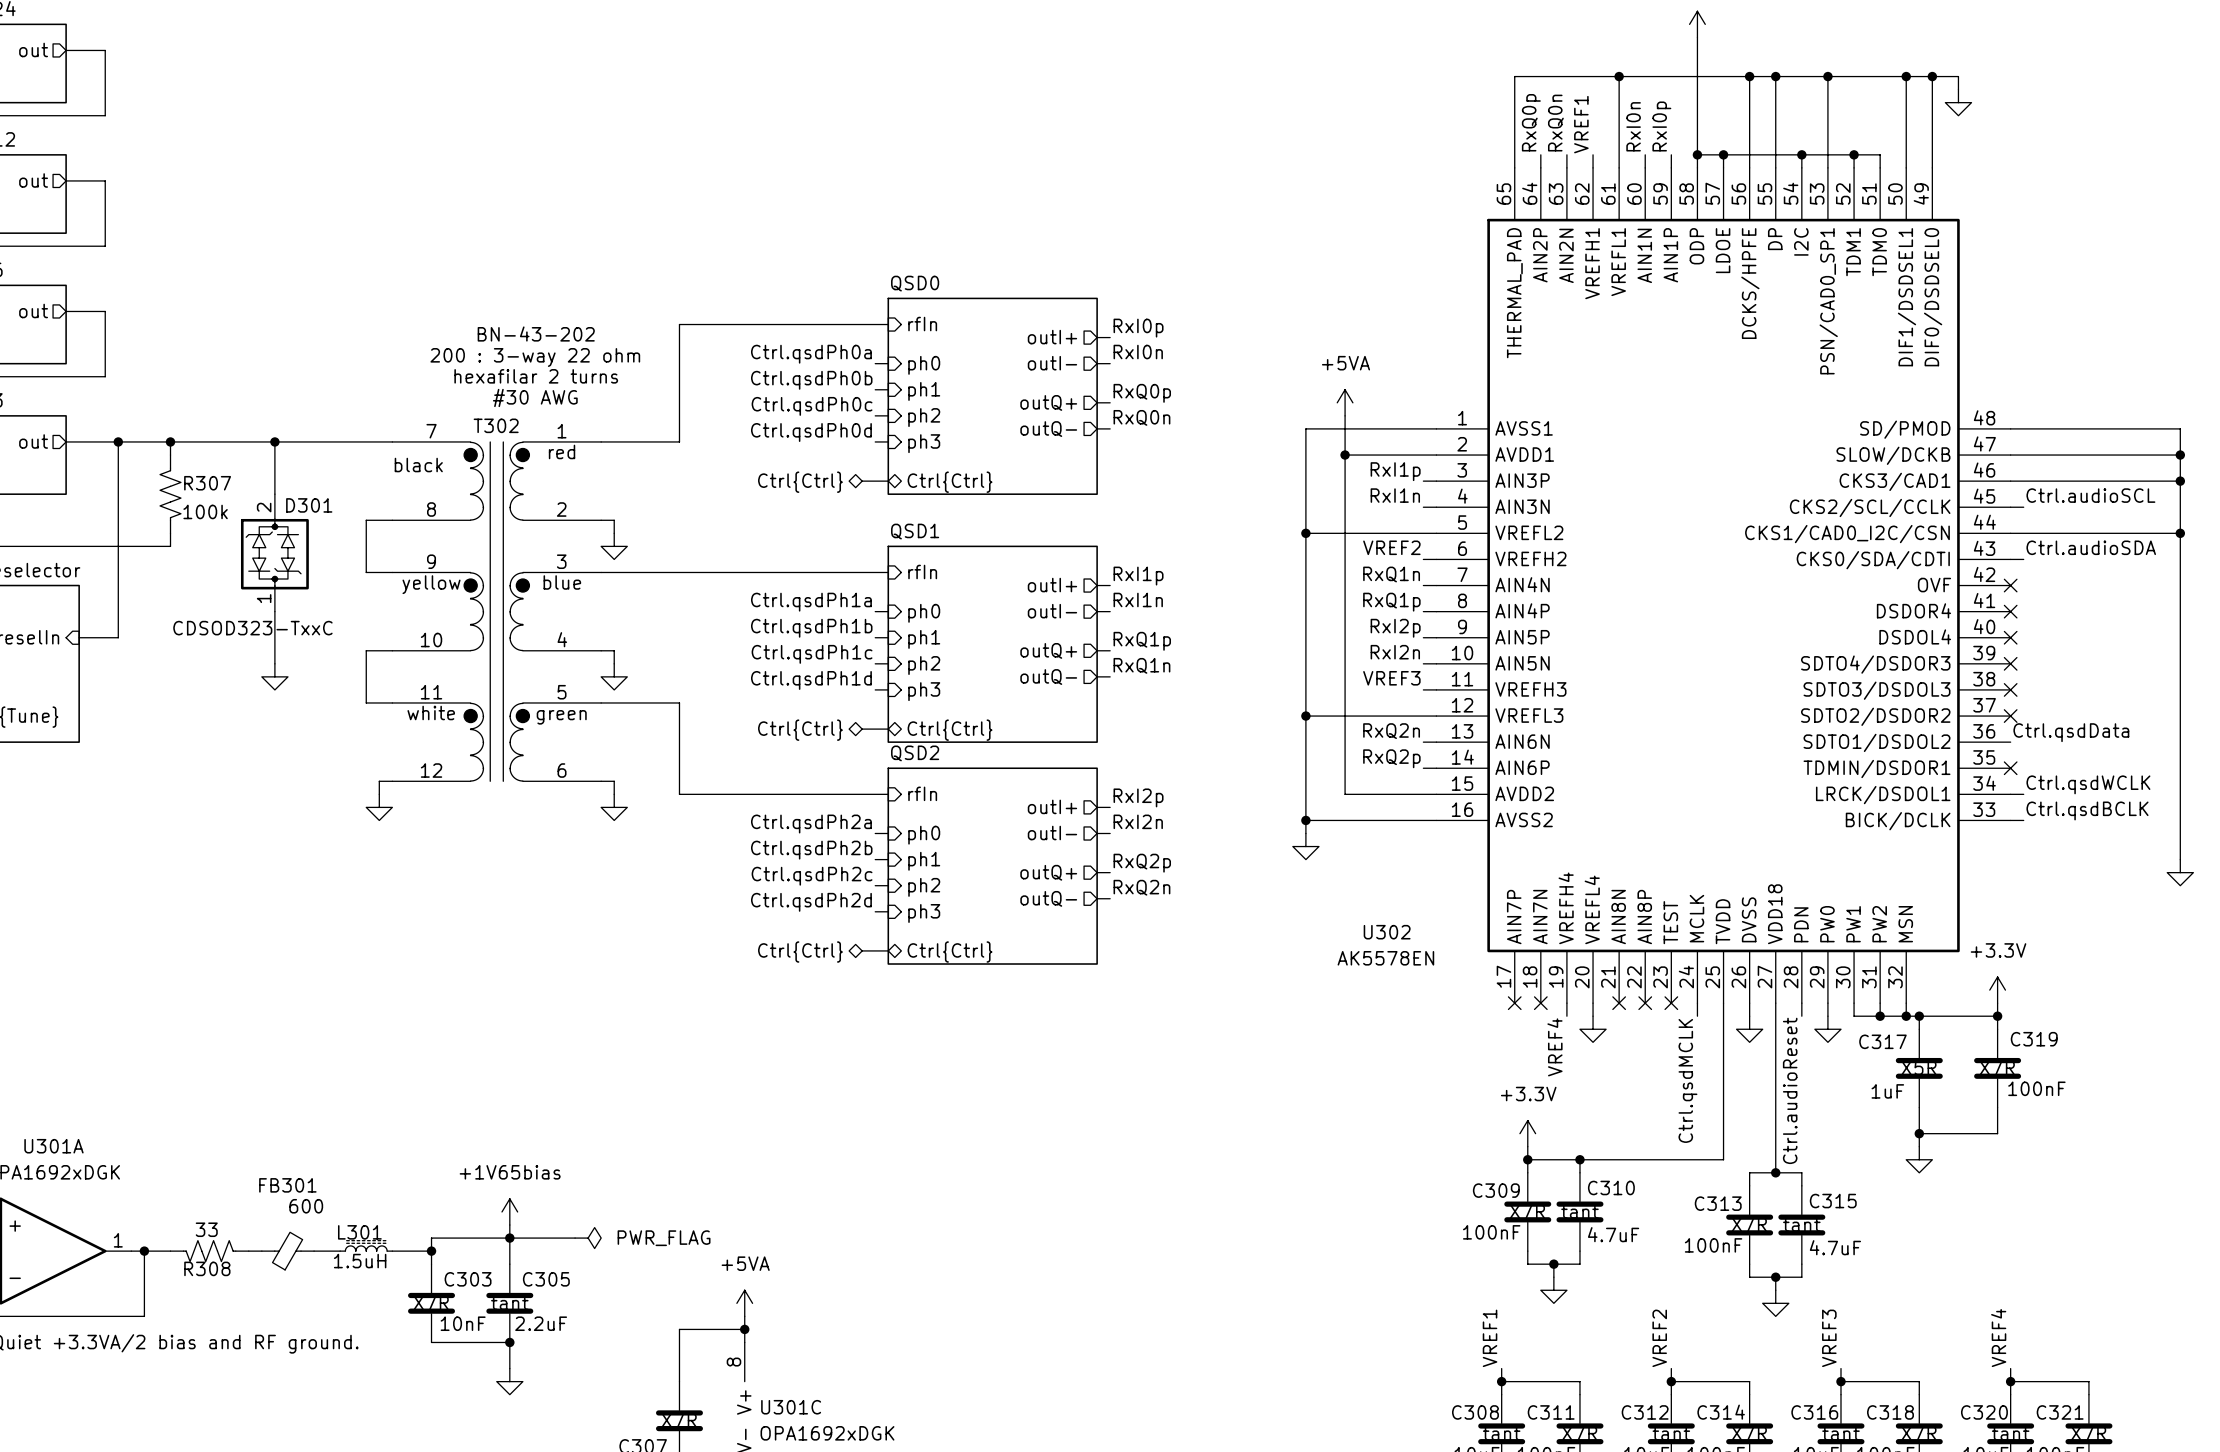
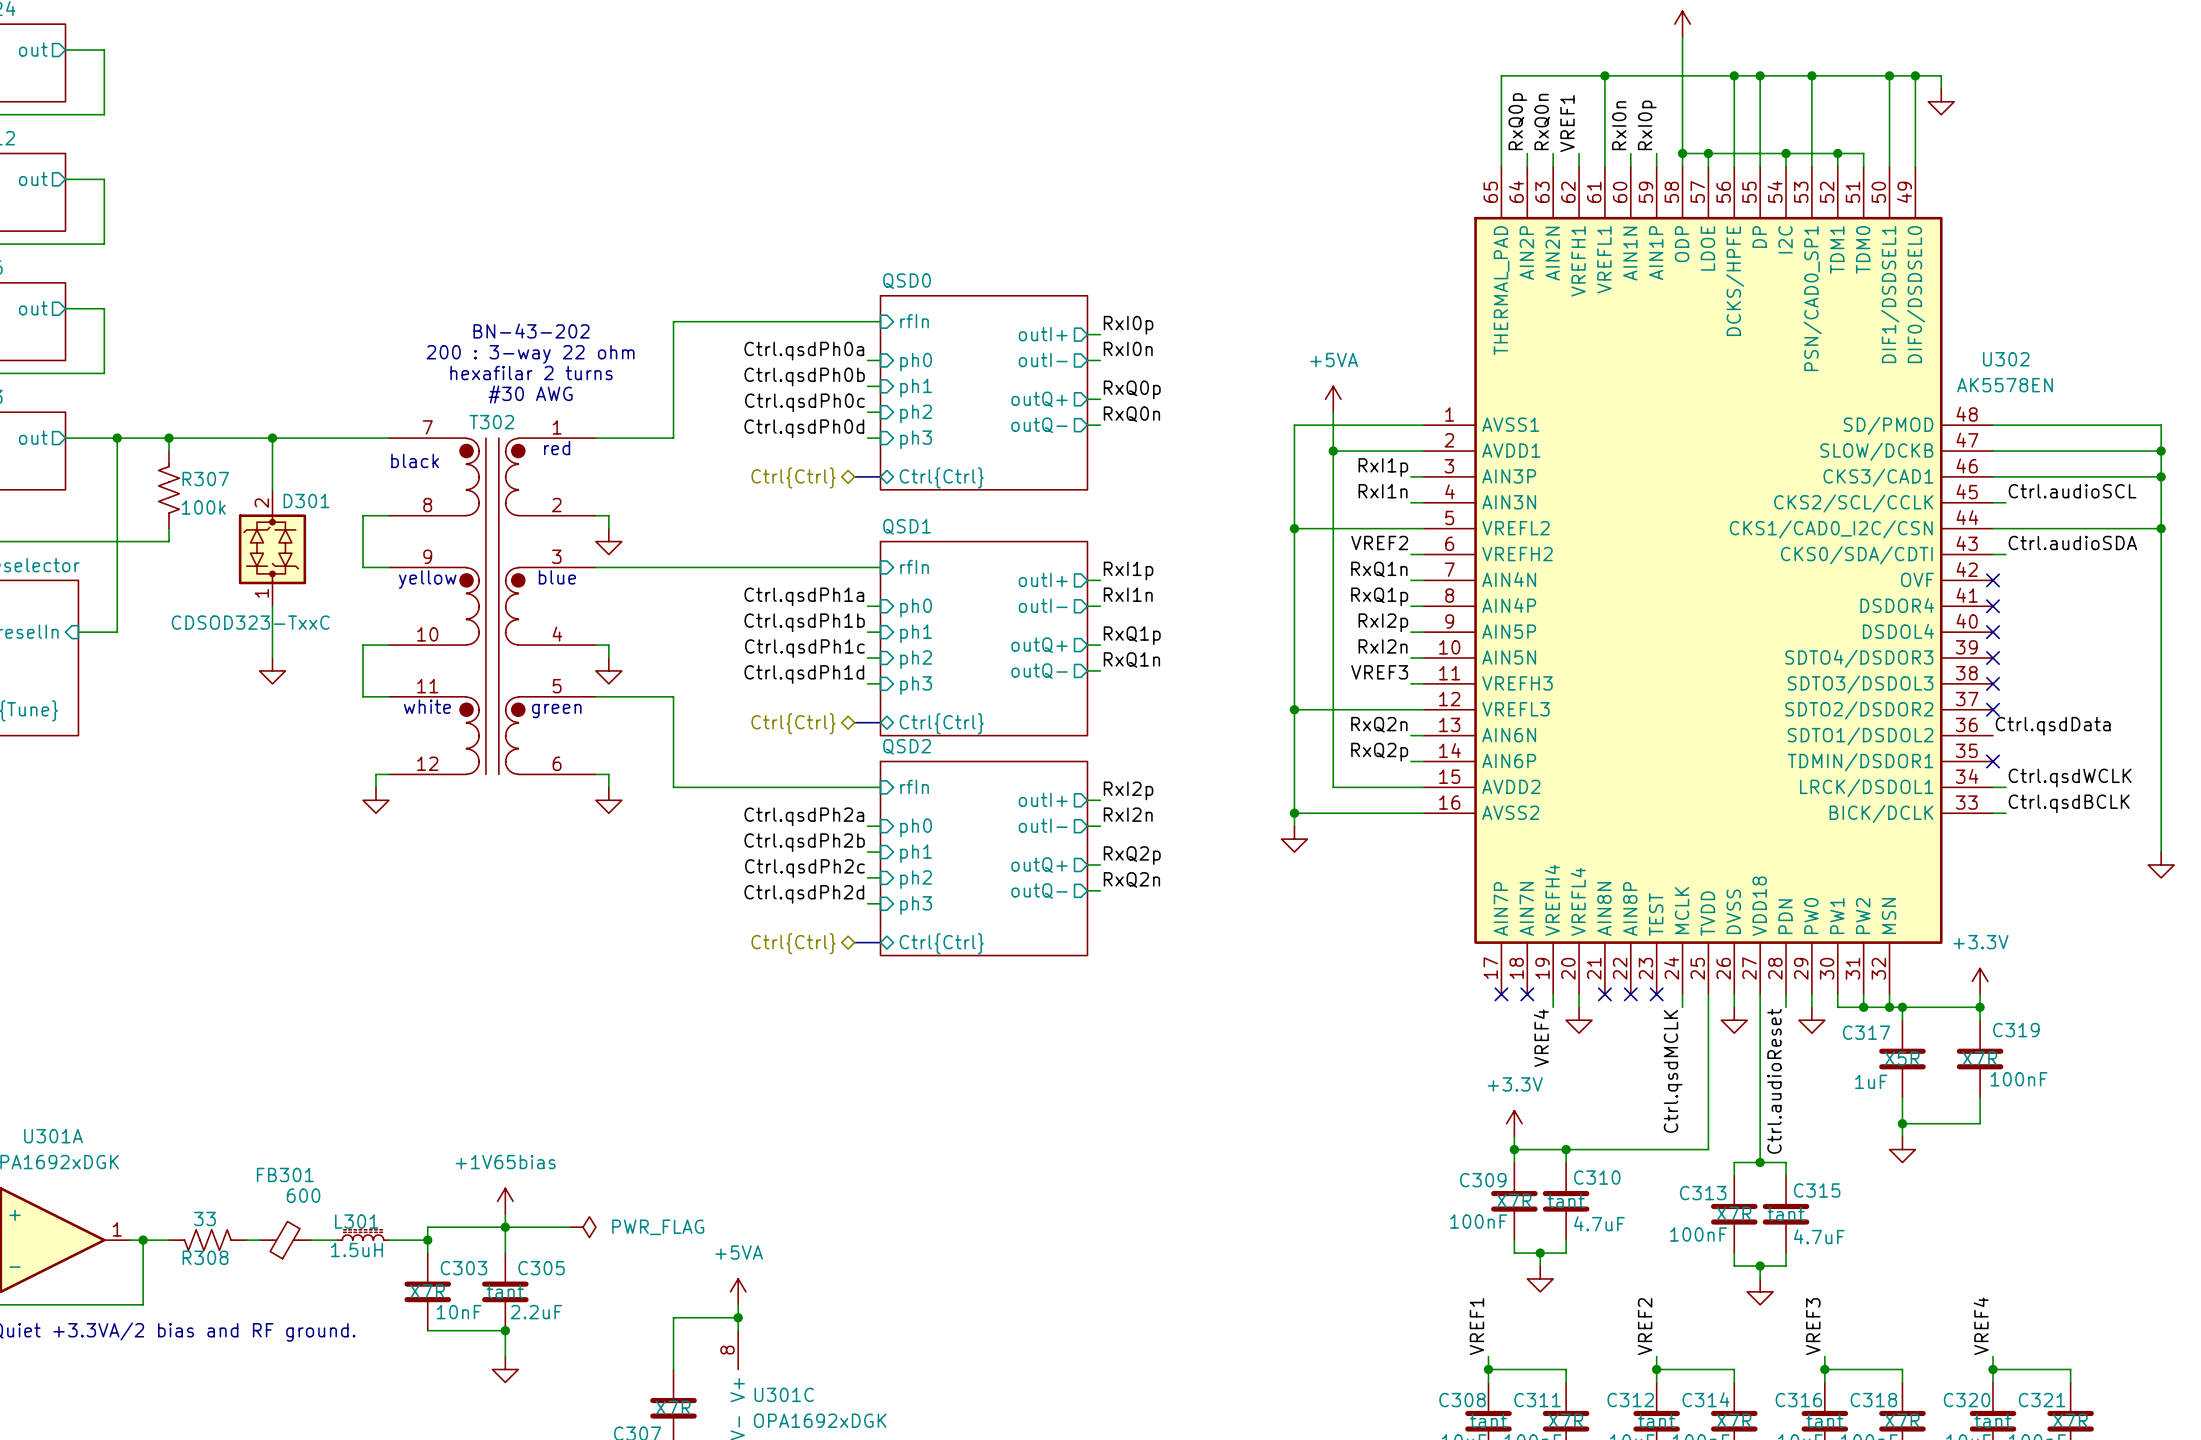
U302 name position: U302 (1387, 932) -> U302 (2006, 359)
U302 value position: AK5578EN (1385, 958) -> AK5578EN (2005, 385)

